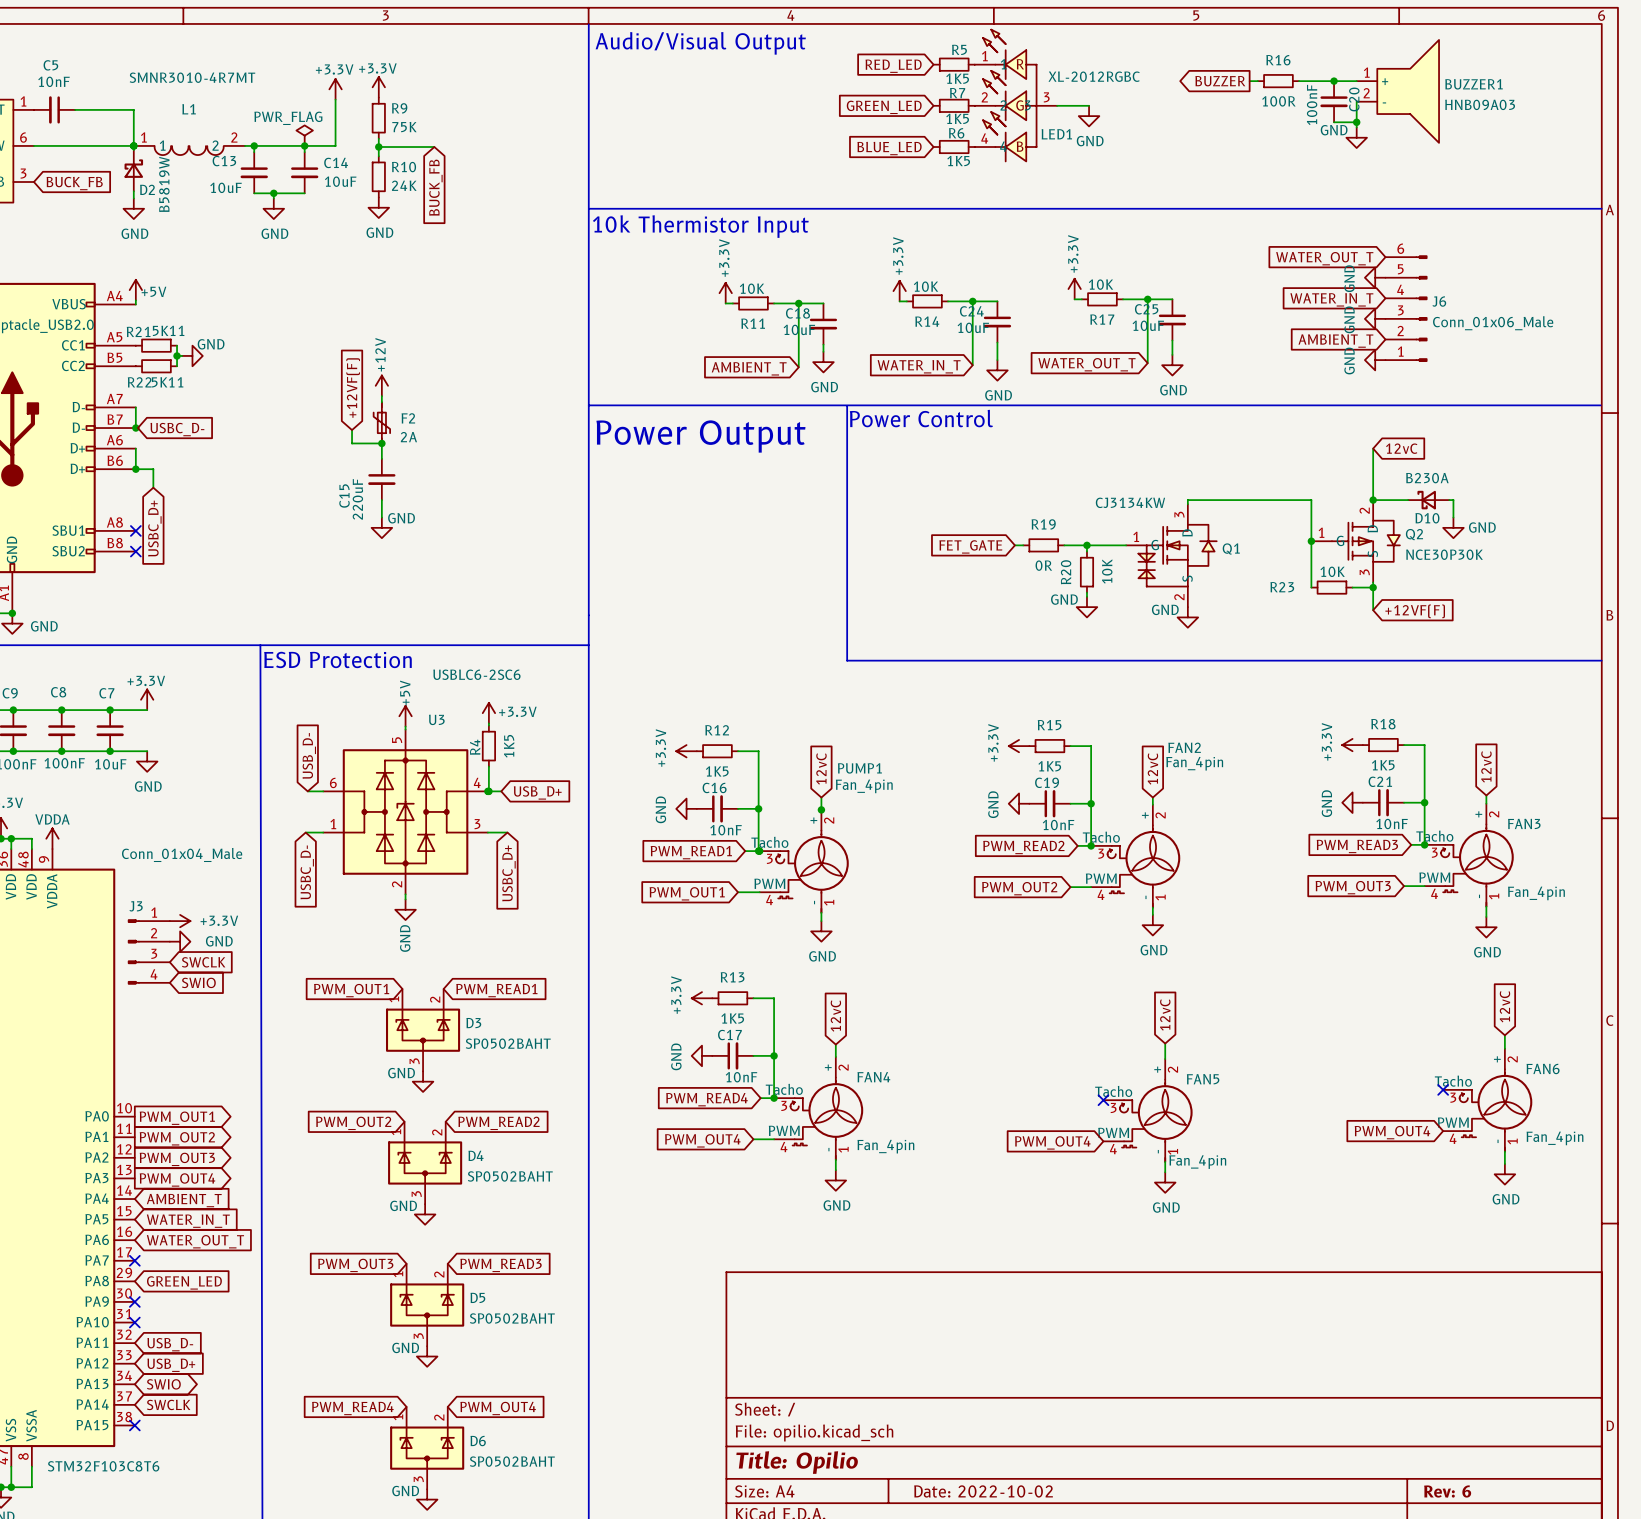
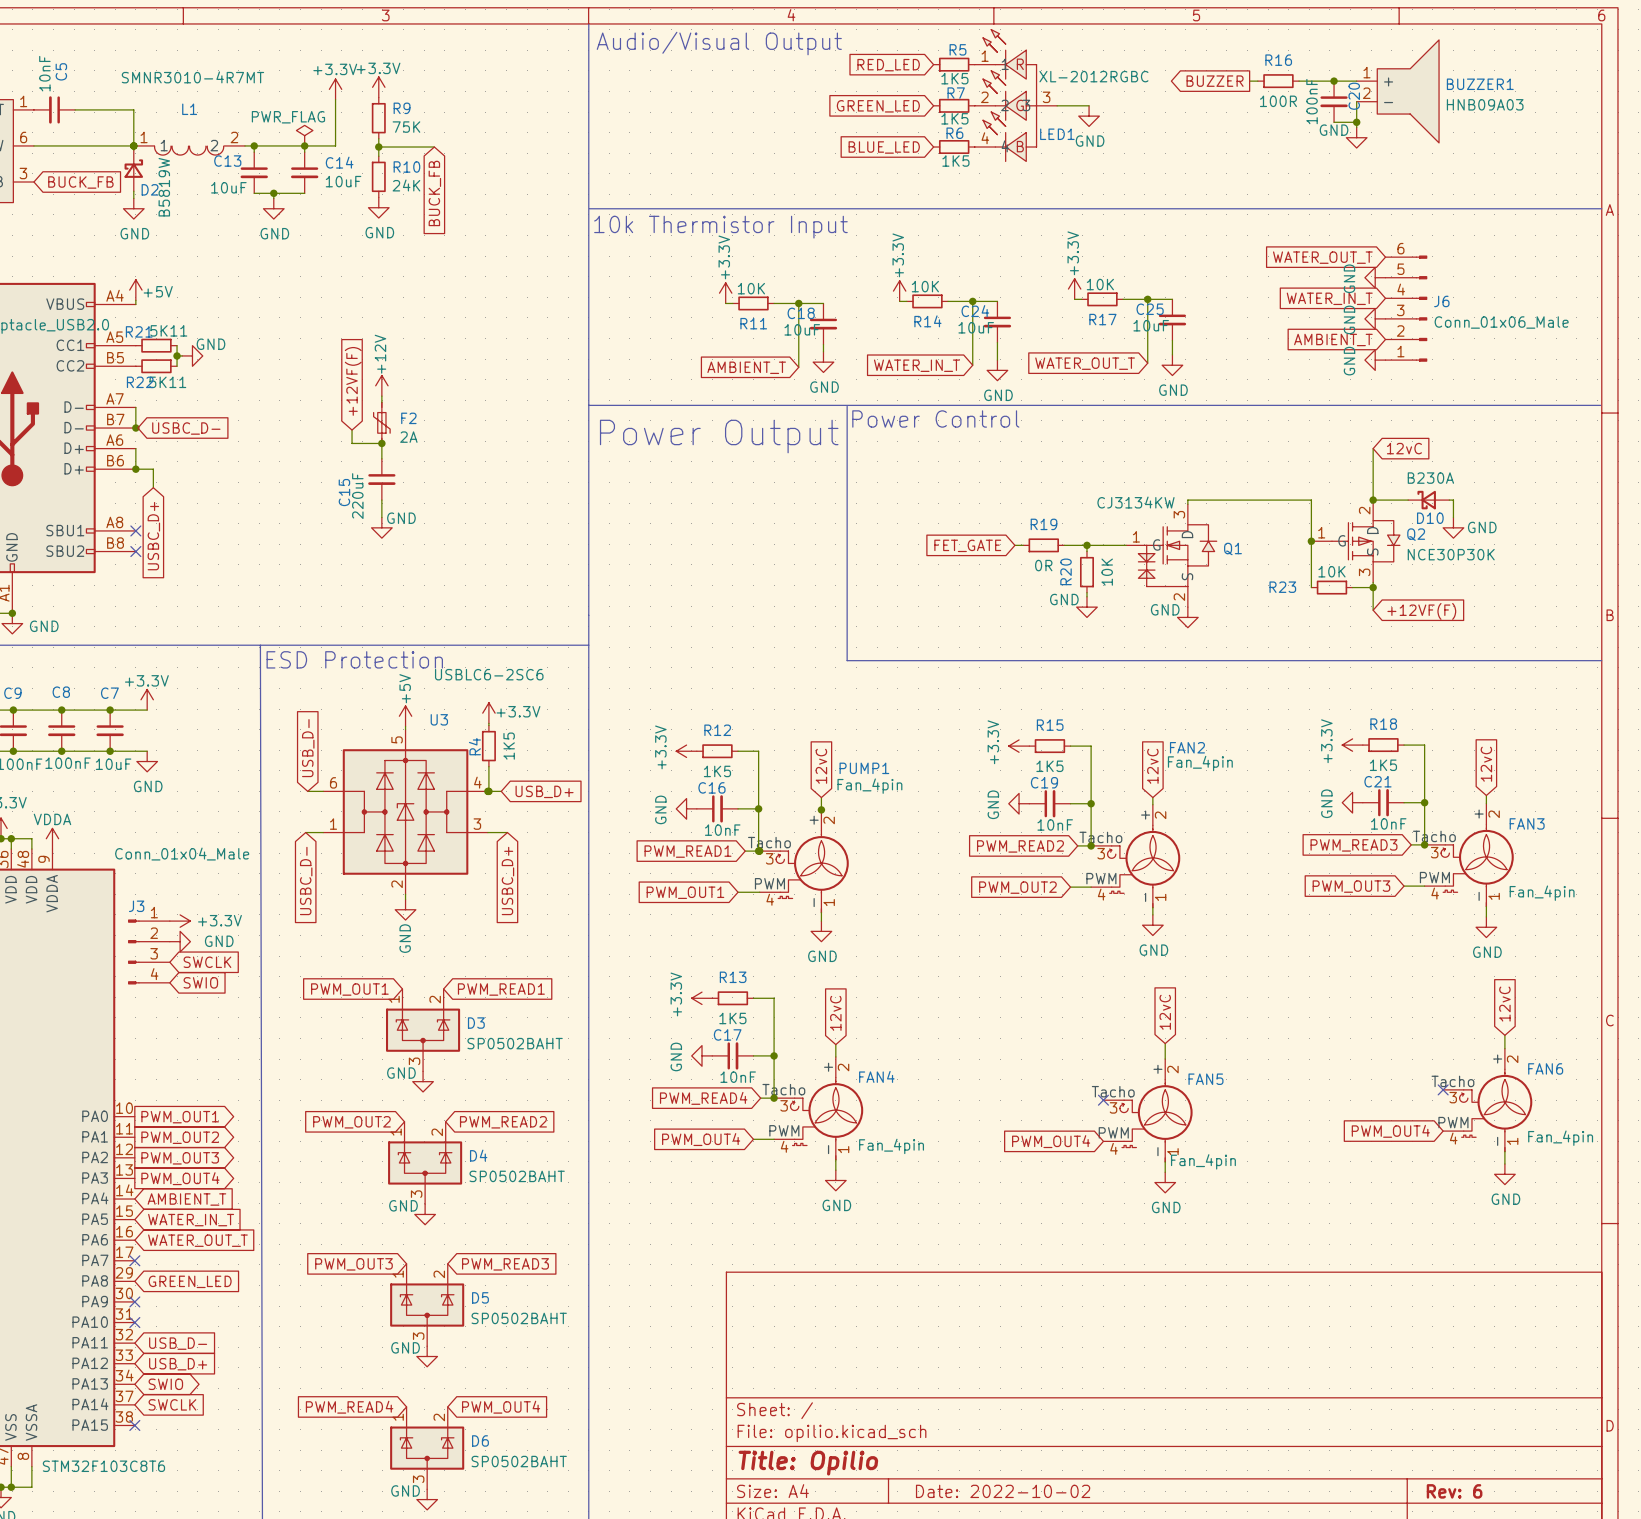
C5 name rotation: 0° (50, 65) -> 90° counterclockwise (61, 71)
C5 value rotation: 0° (53, 81) -> 90° counterclockwise (44, 73)

